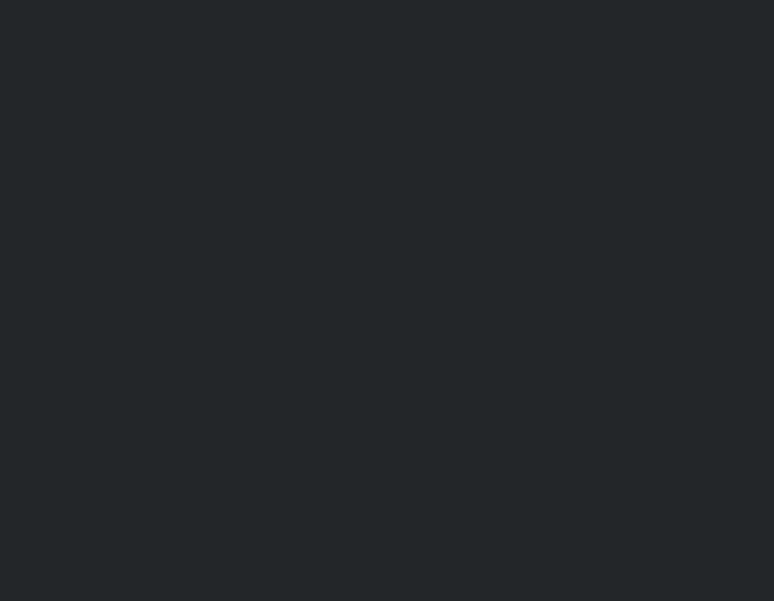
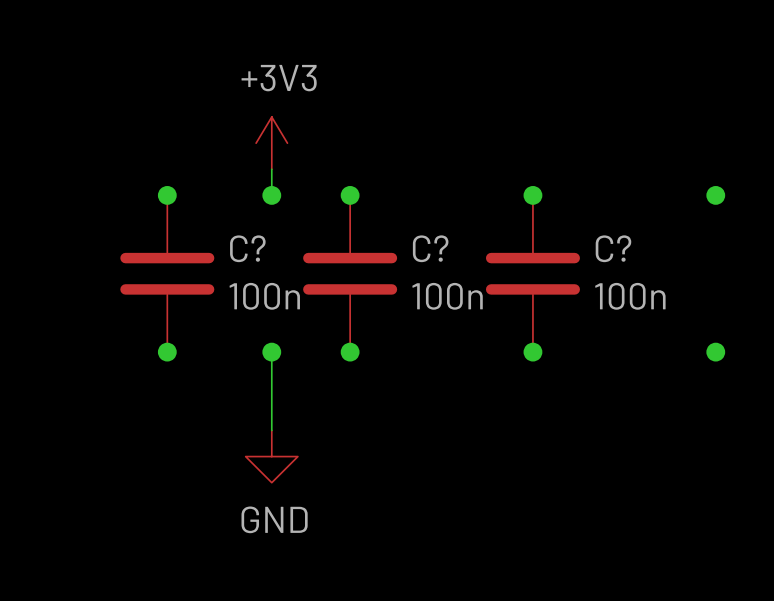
power symbol: none -> +3V3 (271, 143)
wire: none -> (271, 169) (271, 195)
junction: none -> (167, 195)
junction: none -> (271, 195)
junction: none -> (350, 195)
junction: none -> (532, 195)
junction: none -> (715, 195)
C?: none -> 100n (167, 273)
C?: none -> 100n (350, 273)
C?: none -> 100n (532, 273)
junction: none -> (167, 352)
wire: none -> (271, 352) (271, 430)
junction: none -> (271, 352)
junction: none -> (350, 352)
junction: none -> (532, 352)
junction: none -> (715, 352)
power symbol: none -> GND (271, 456)

